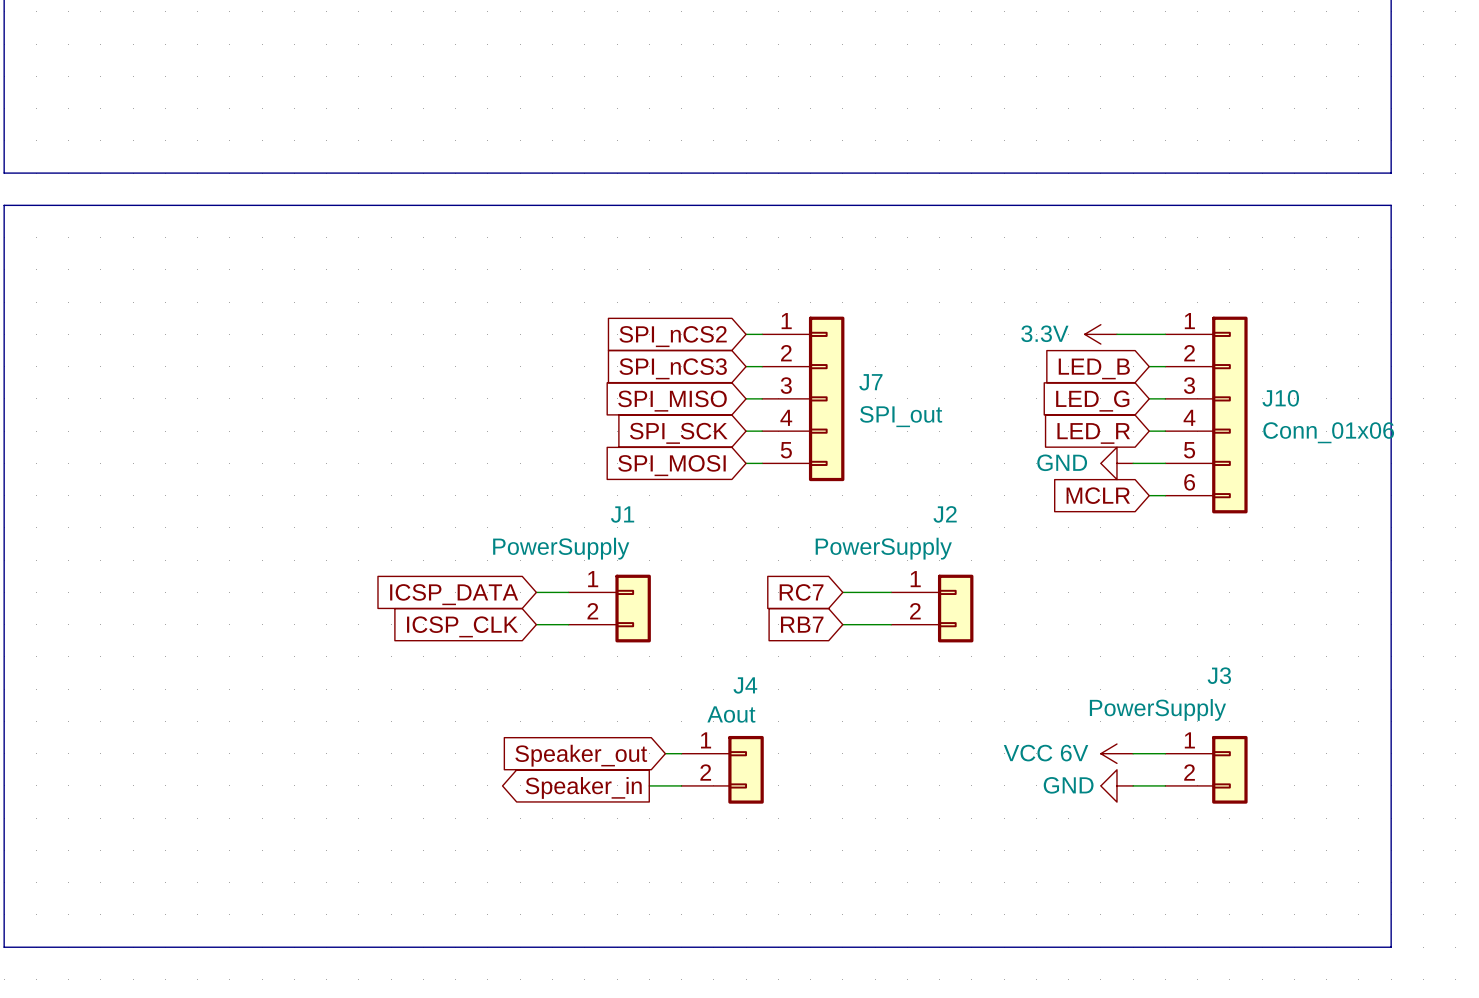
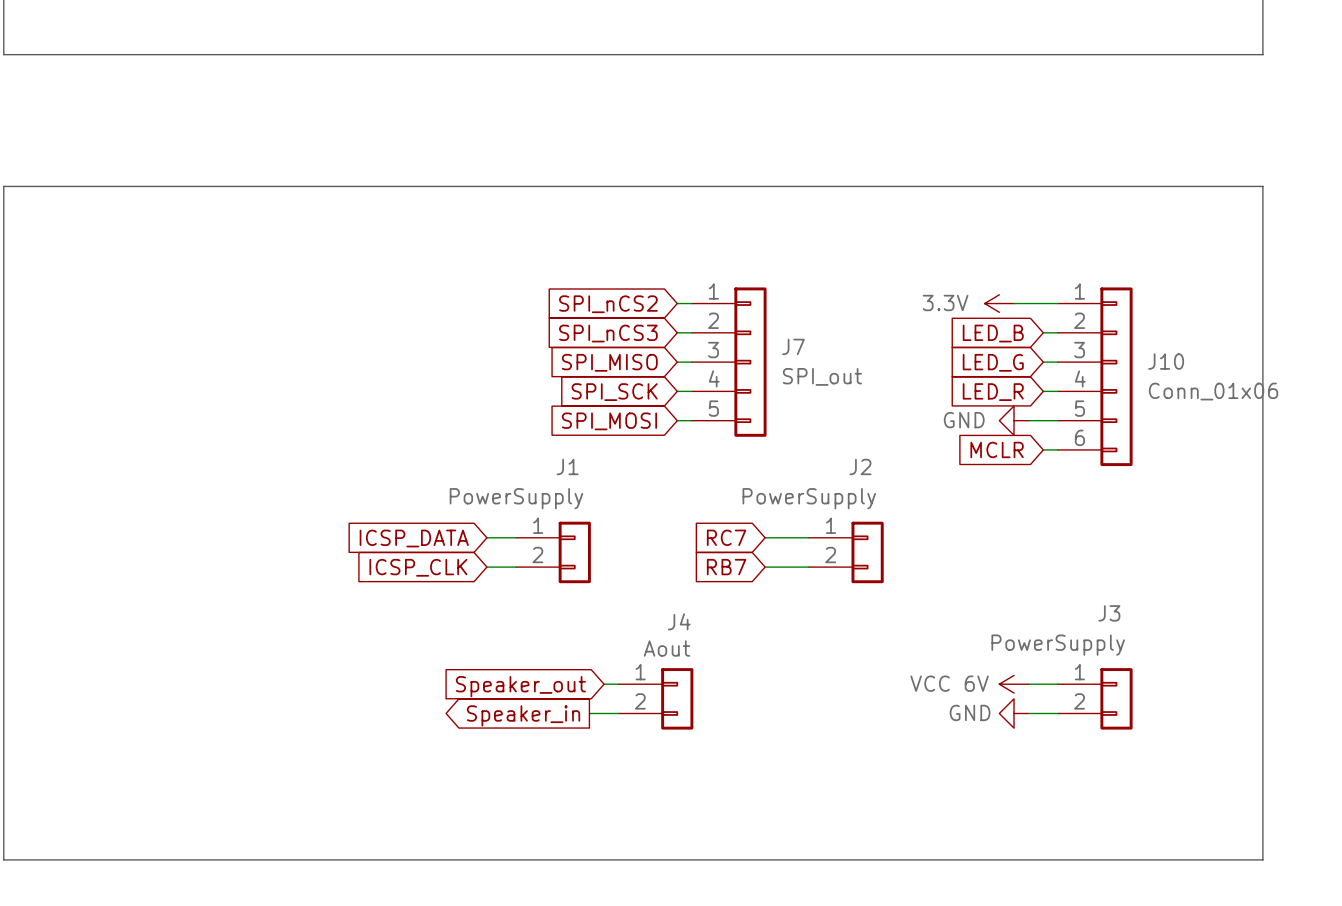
line: (4, 60) (4, 173) (1391, 173) (1391, 60) -> (3, 54) (1262, 54)

